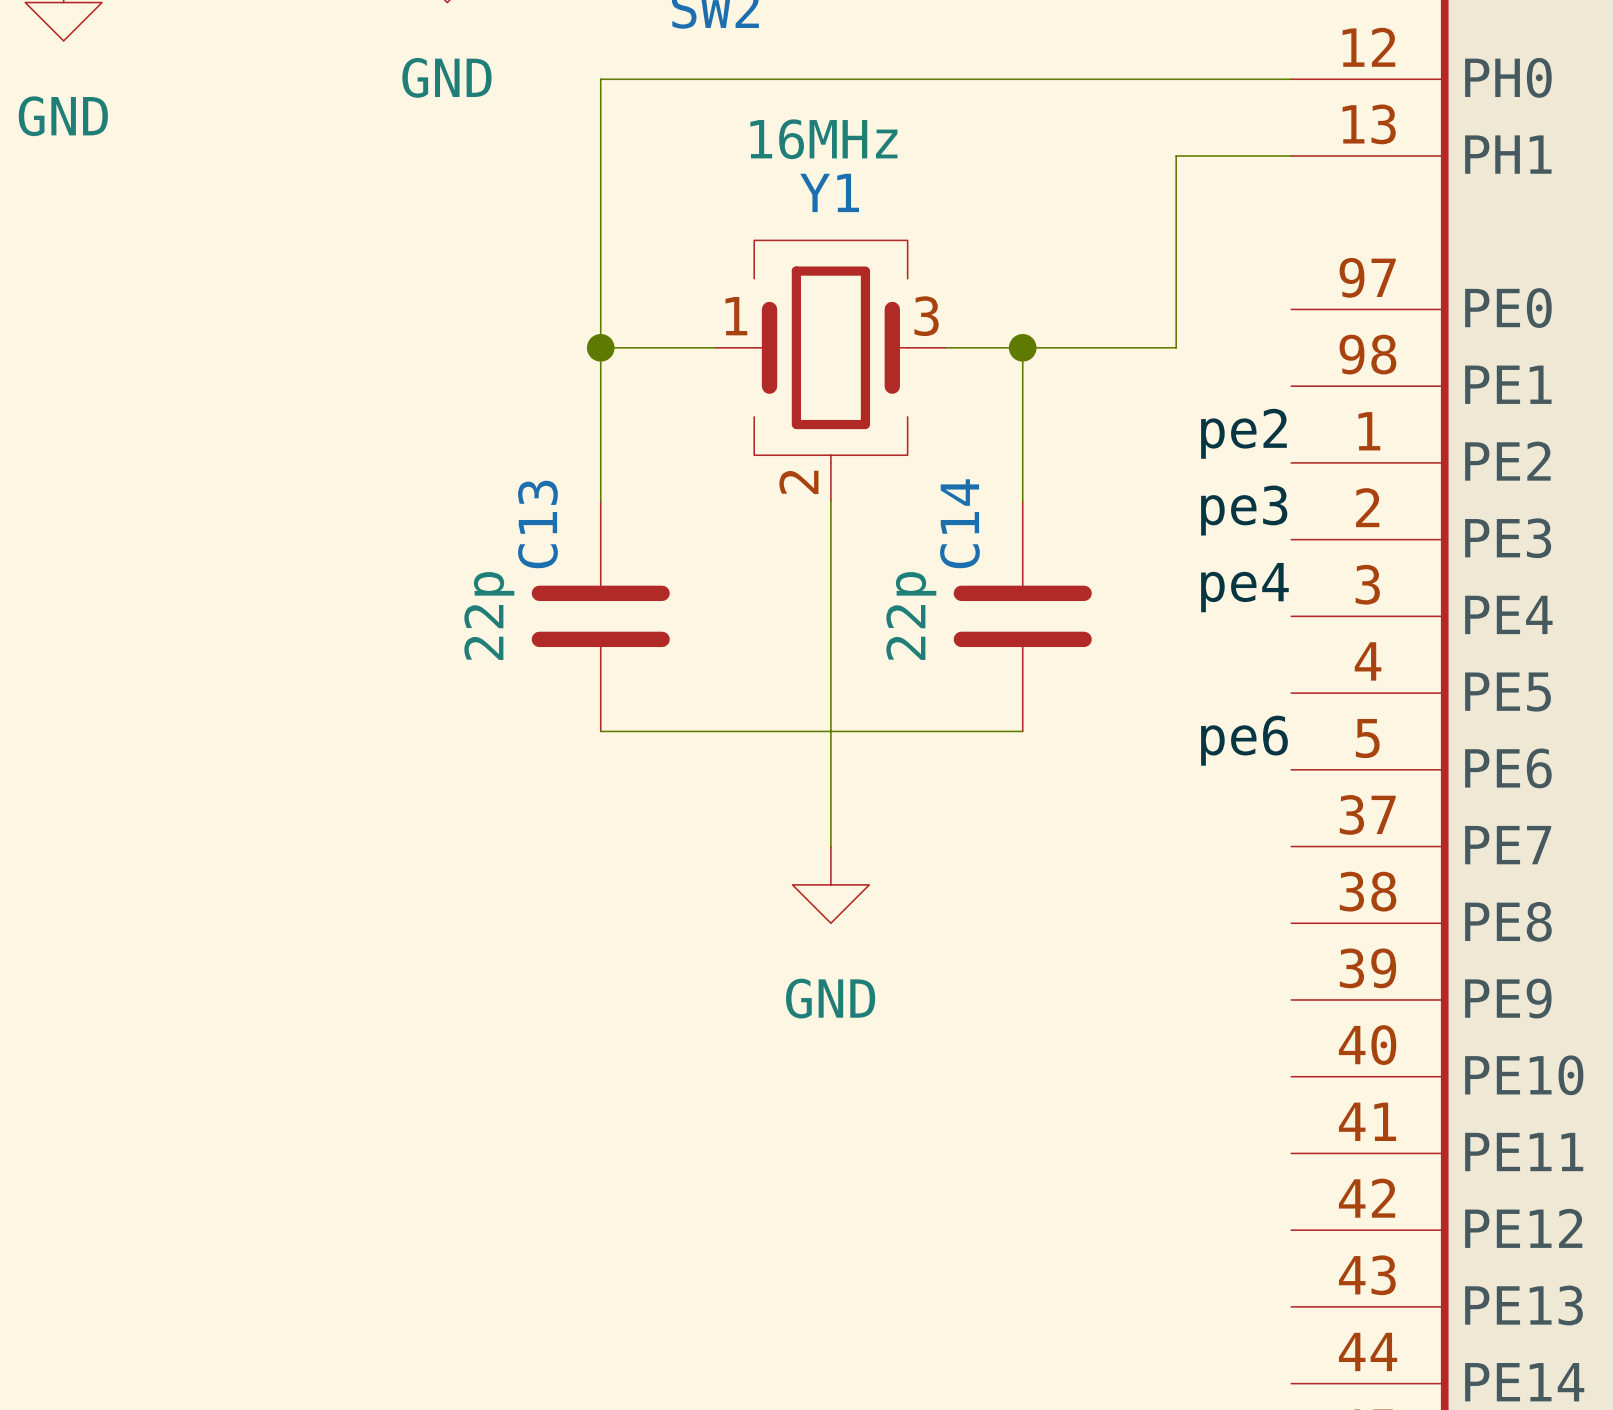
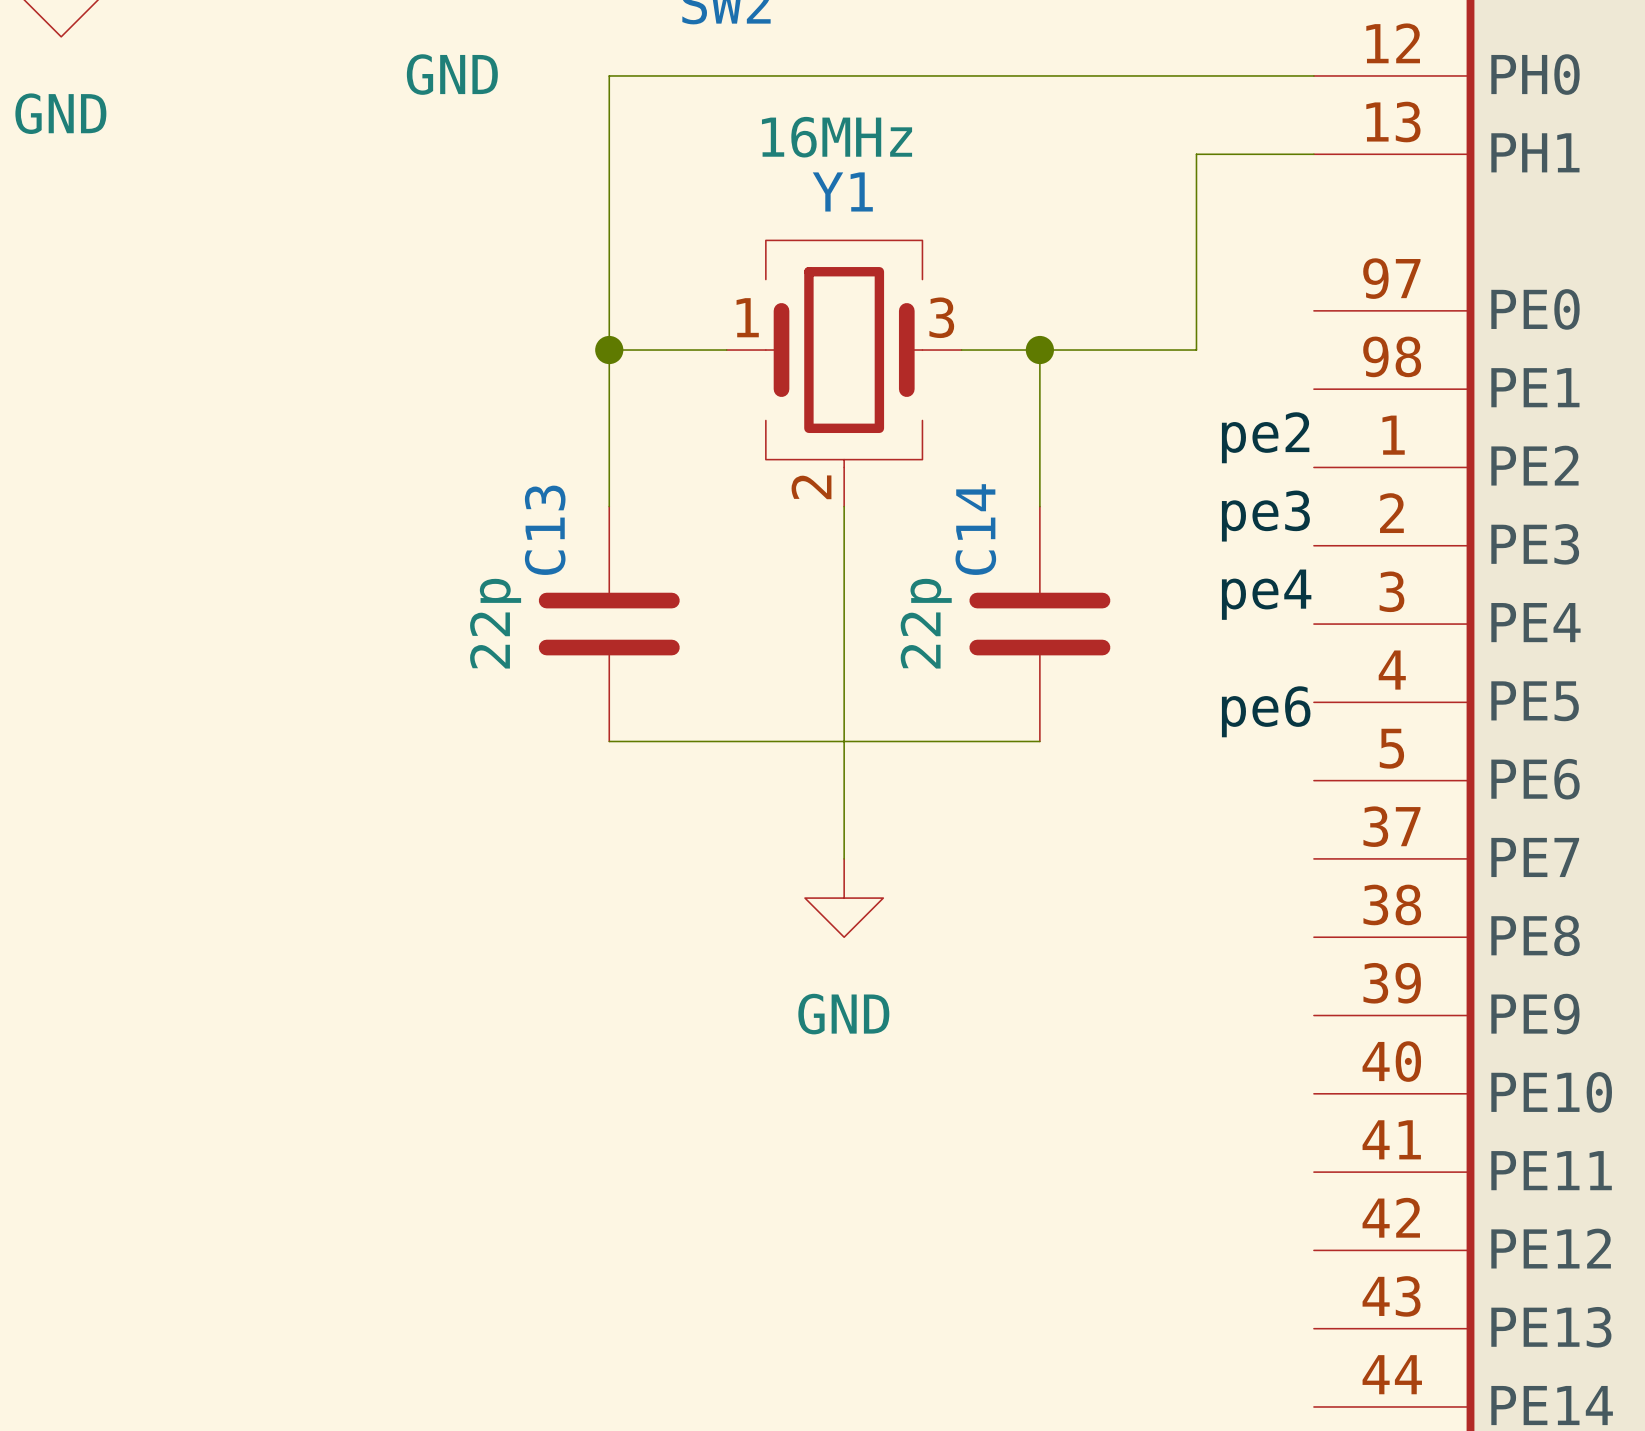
label position: pe6 (1244, 740) -> pe6 (1266, 711)

